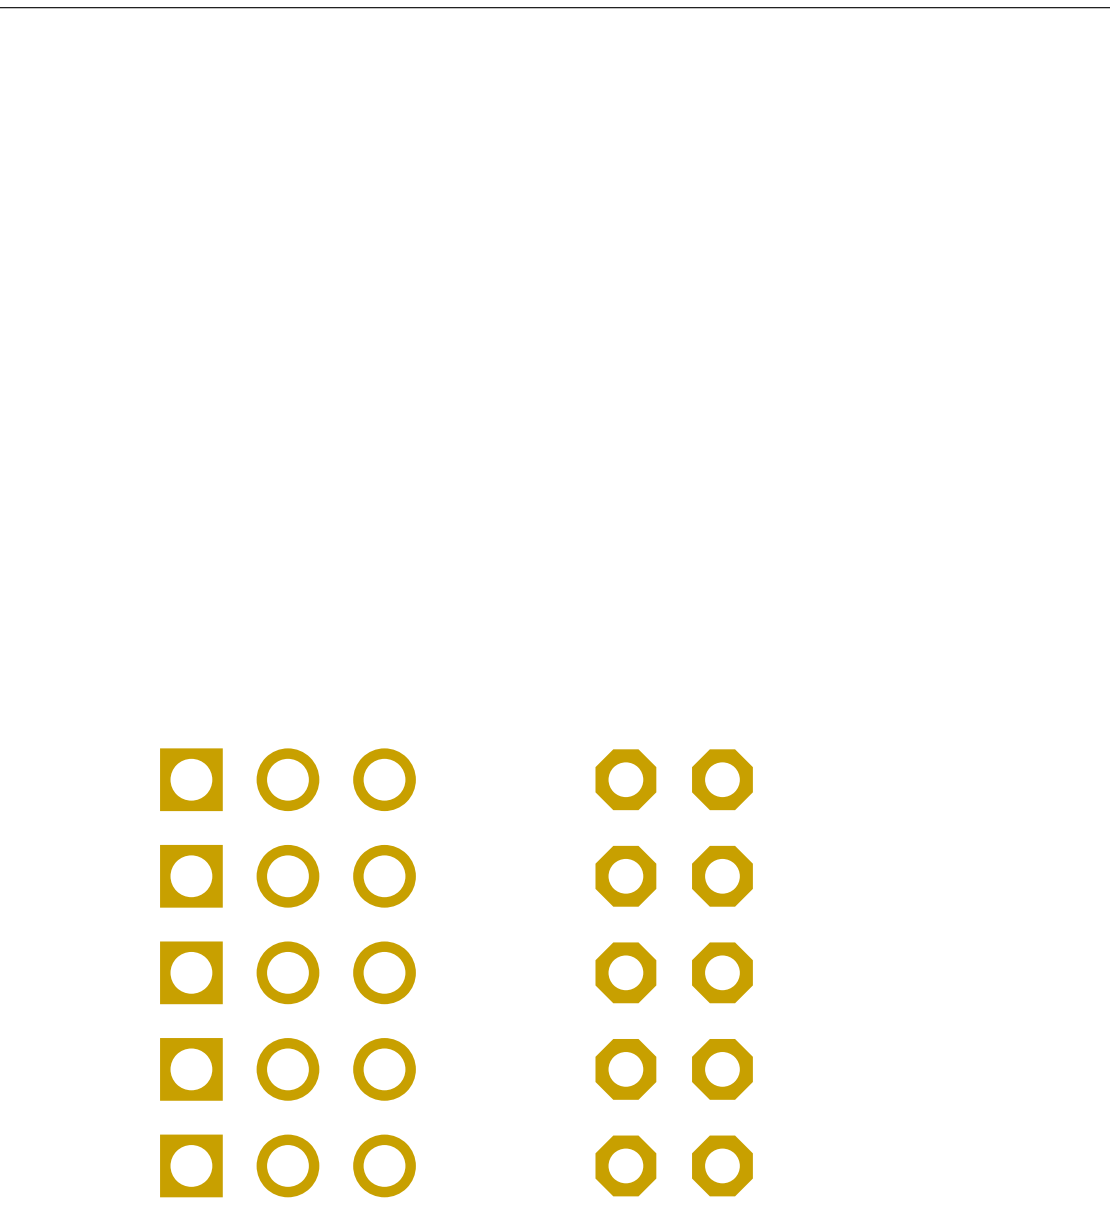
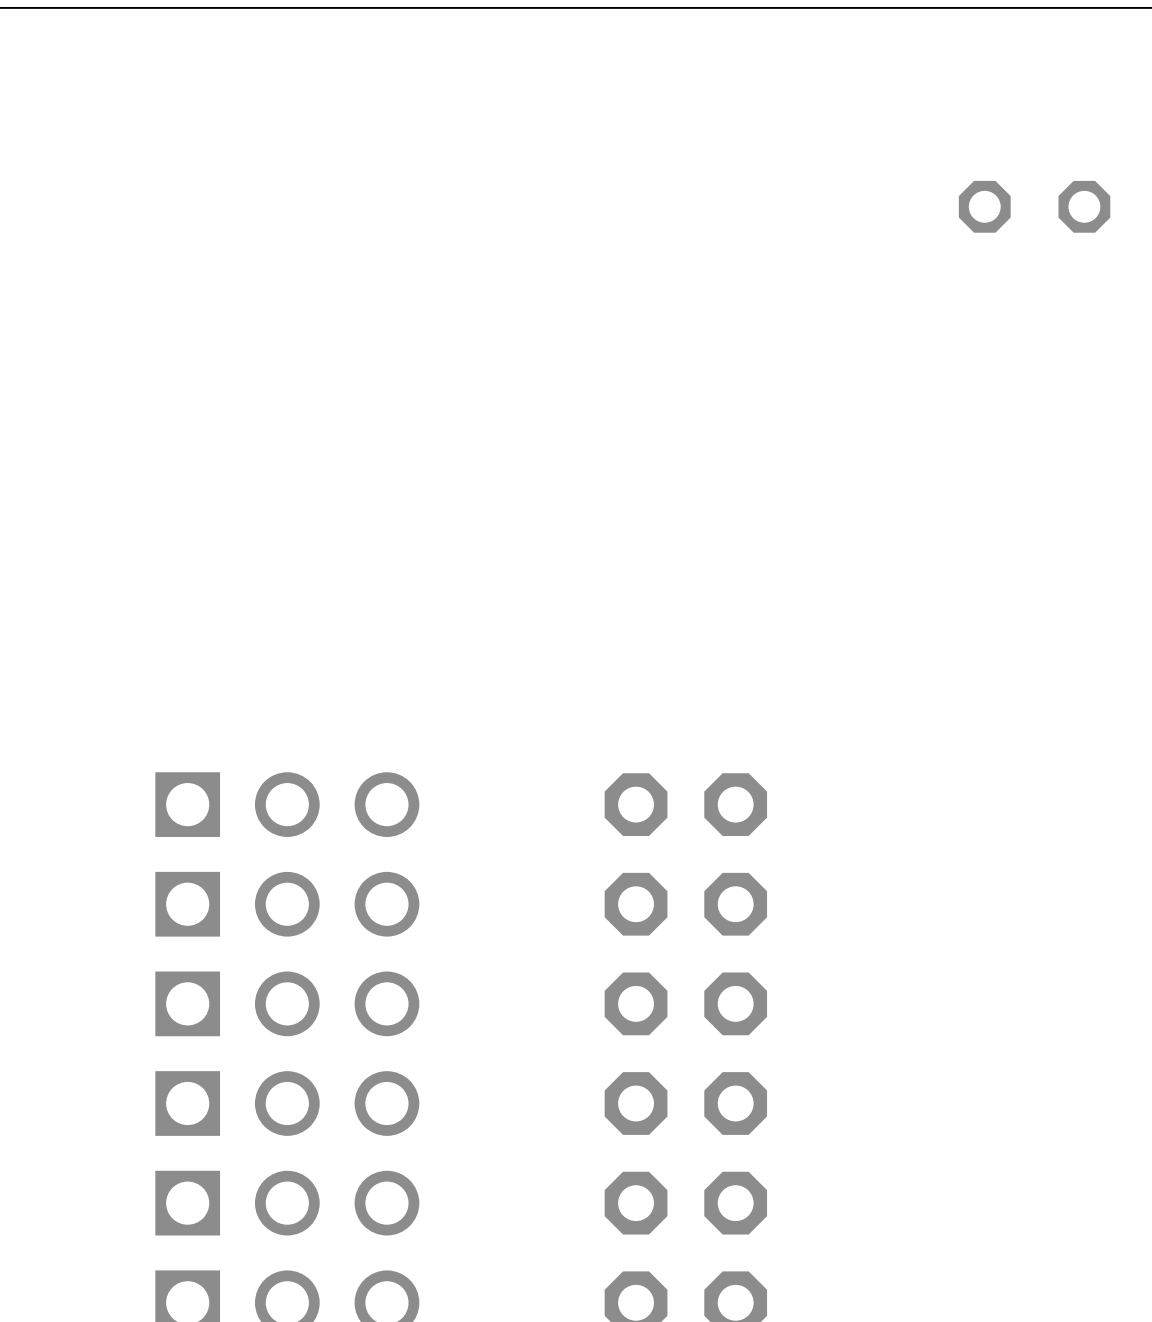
part: none -> (1034, 206)

